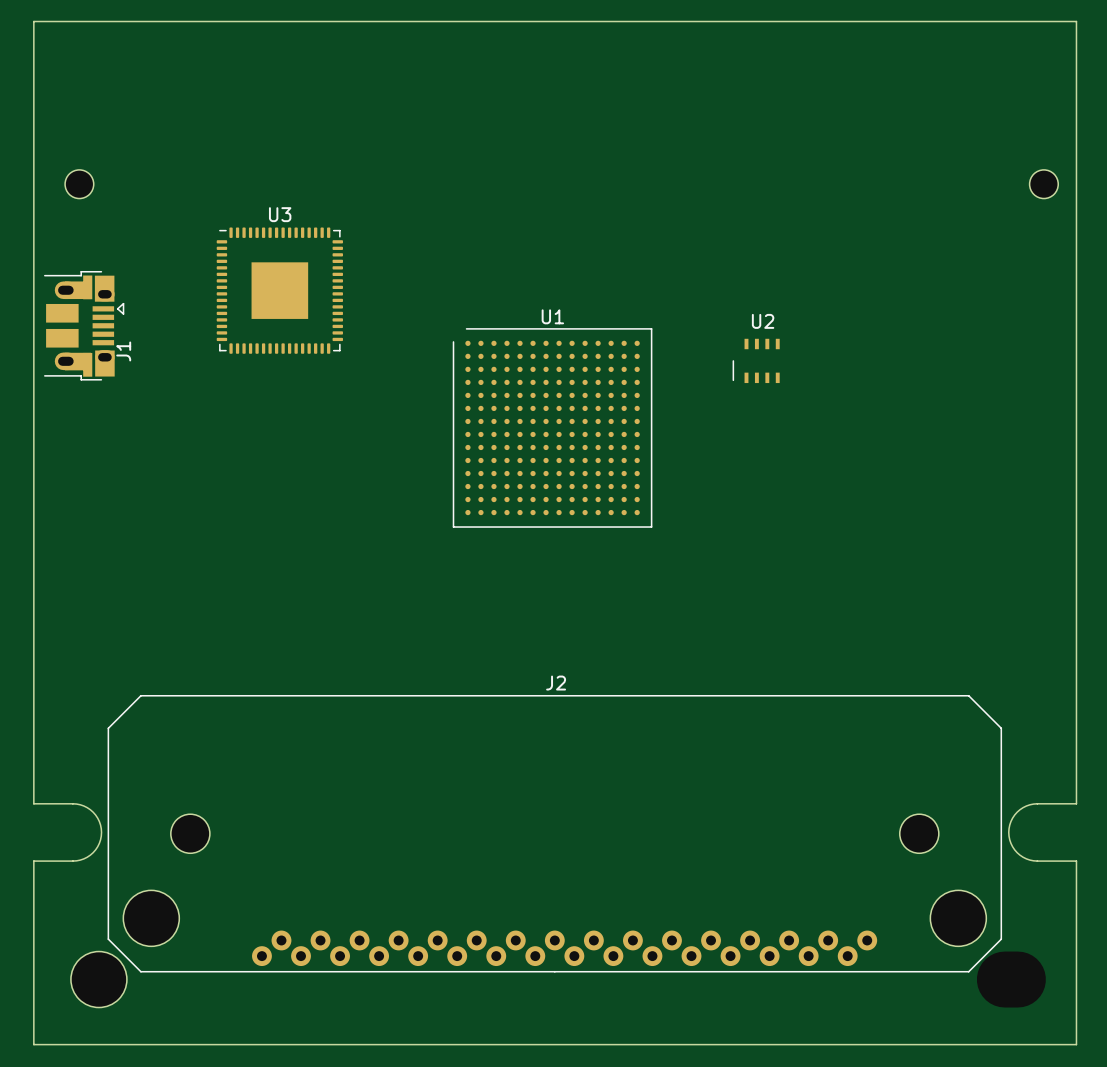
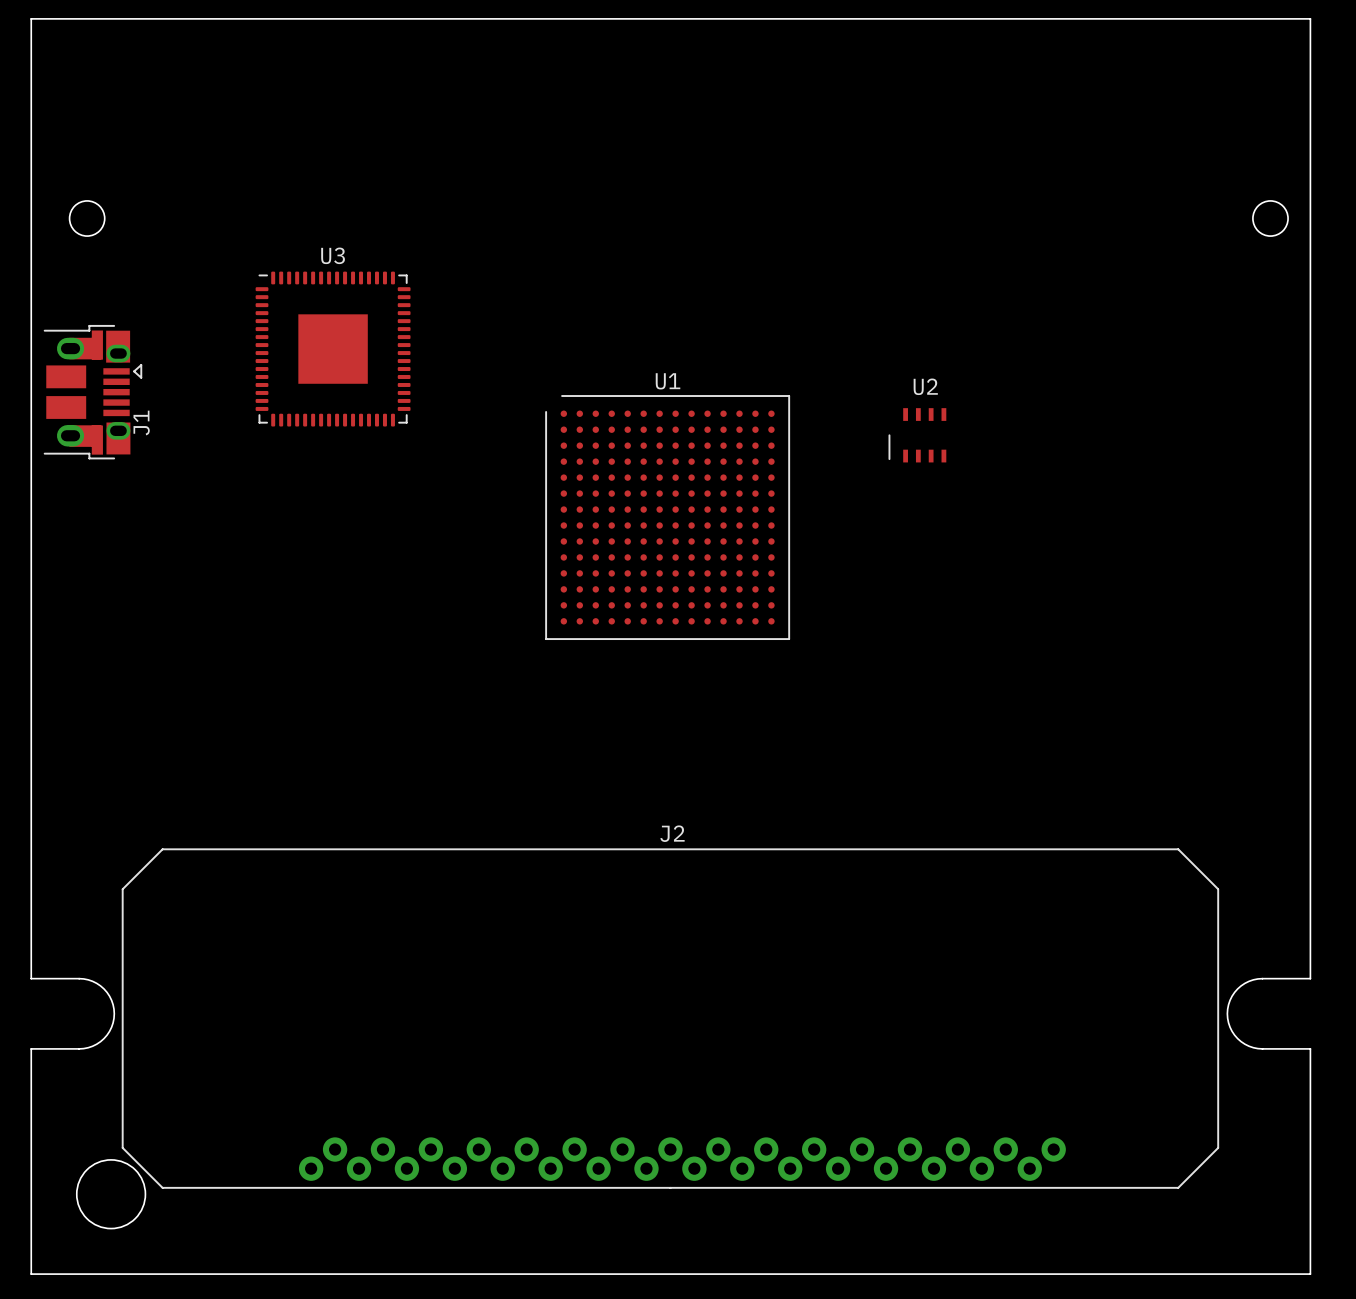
J2 footprint: [107, 694, 1003, 973] -> [121, 848, 1220, 1189]

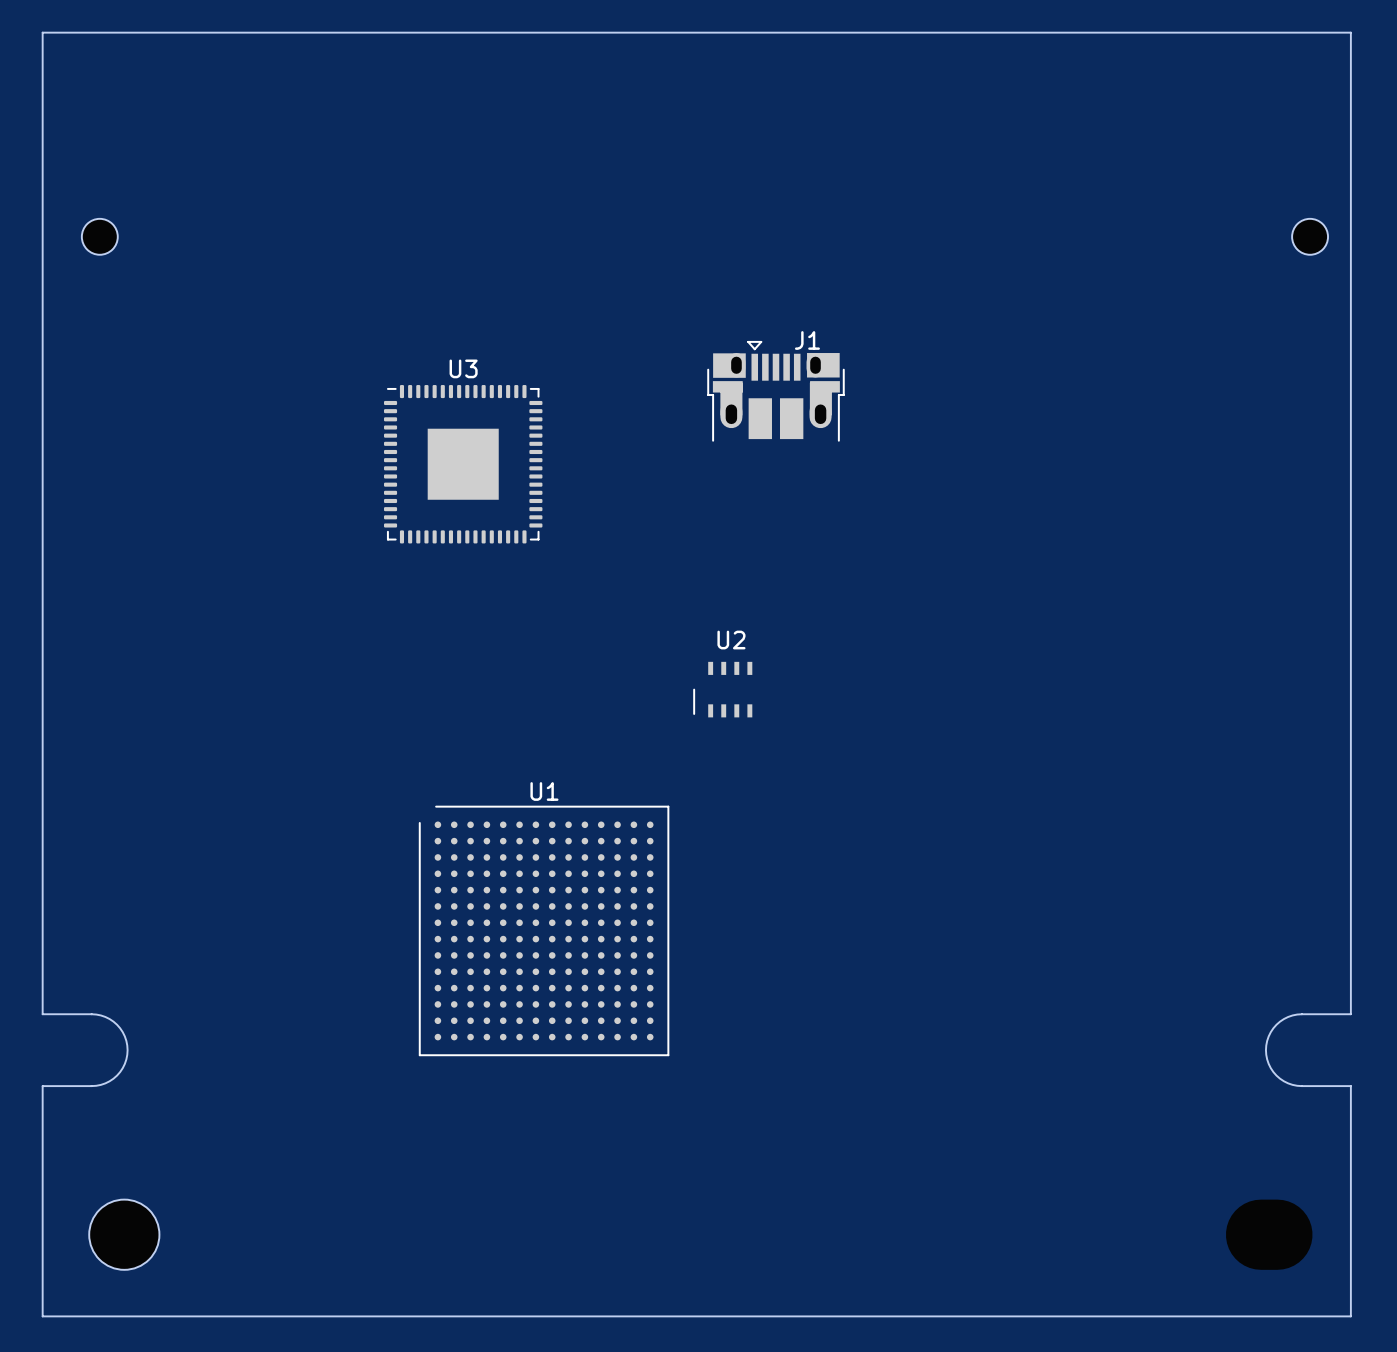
U3 position: (333, 349) -> (463, 464)
J1 rotation: 0° (92, 392) -> 90° counterclockwise (775, 391)
J1 position: (92, 392) -> (775, 391)
U2 position: (917, 435) -> (722, 689)
U1 position: (667, 517) -> (544, 930)
J2: (670, 1018) -> none

